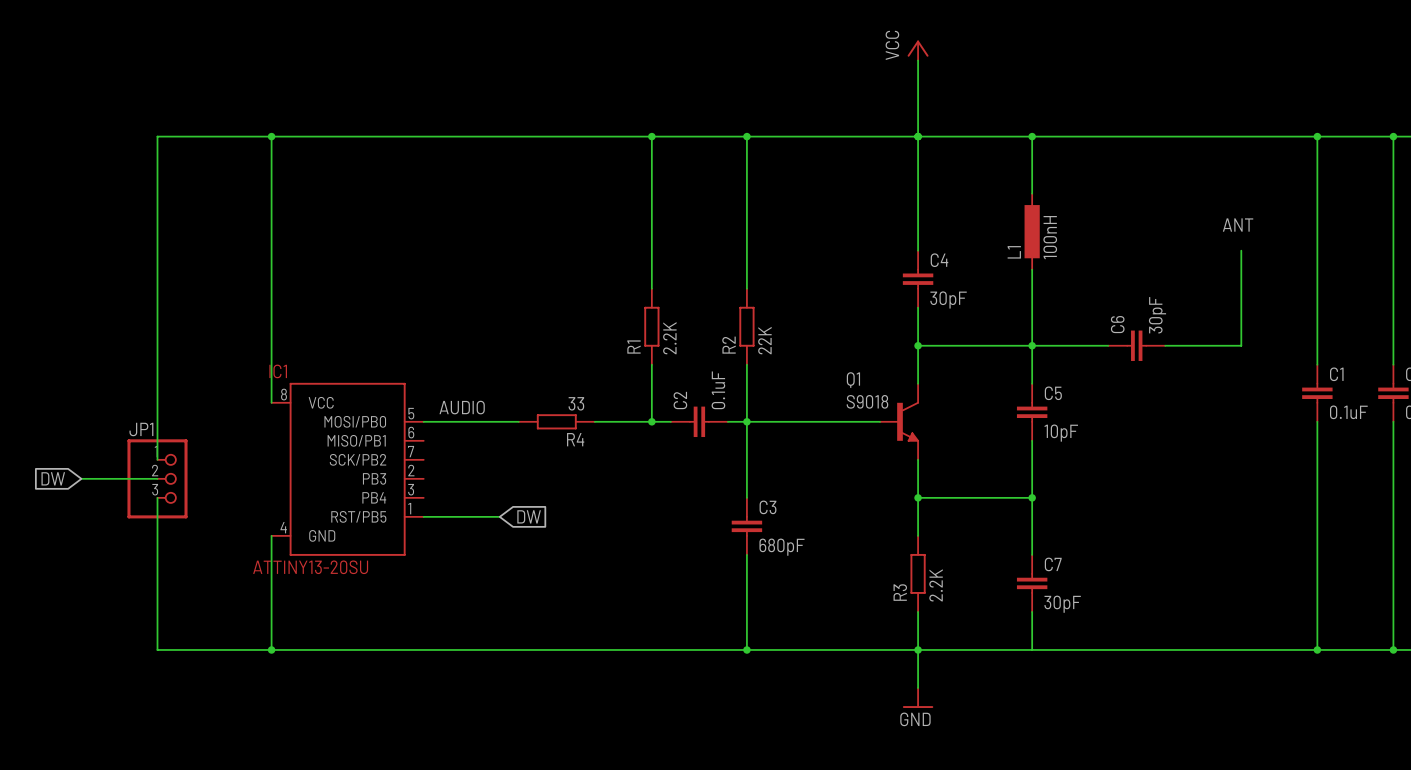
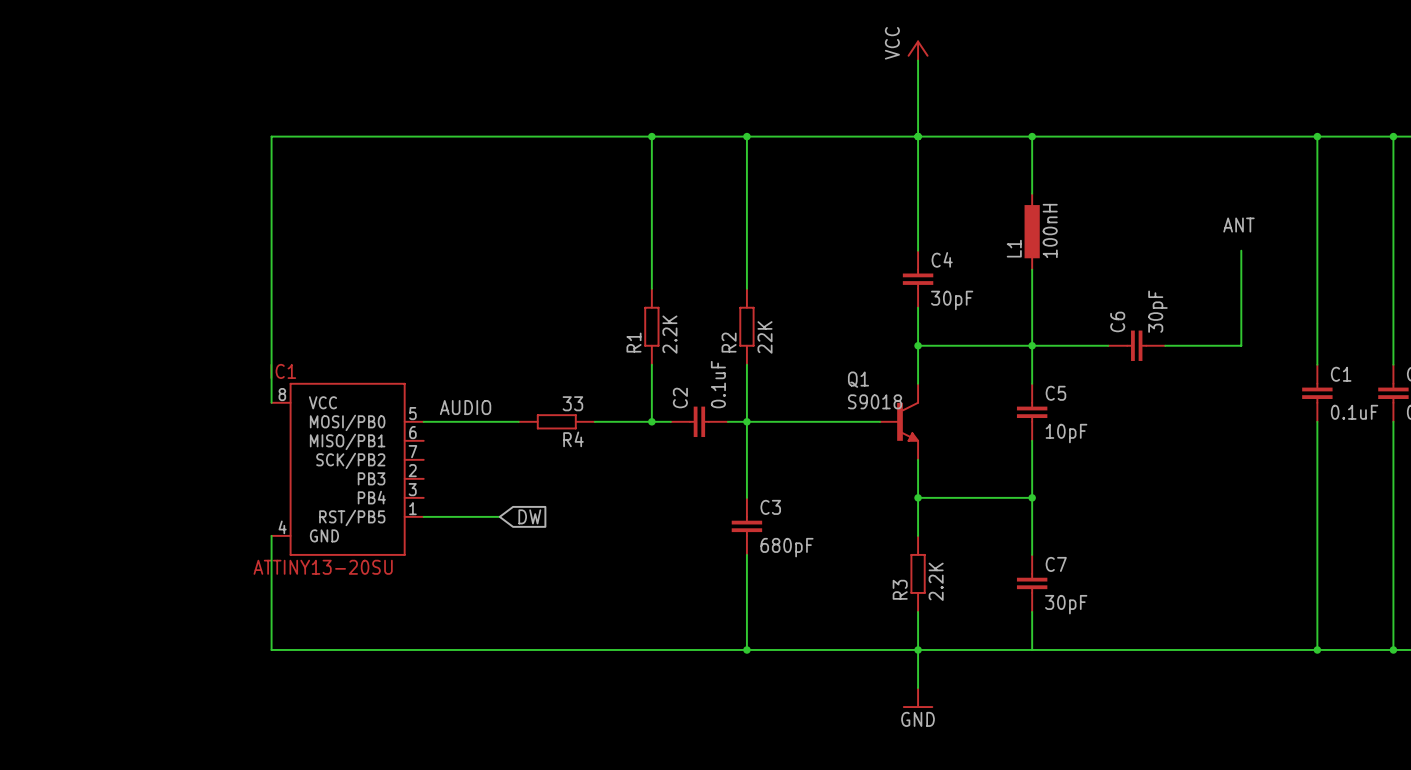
wire: (271, 136) (157, 136) (157, 459) -> none
junction: (271, 136) -> none
global label: DW (53, 478) -> none
wire: (81, 478) (157, 478) -> none
JP1: (157, 478) -> none
wire: (157, 497) (157, 649) (271, 649) -> none
junction: (271, 649) -> none

